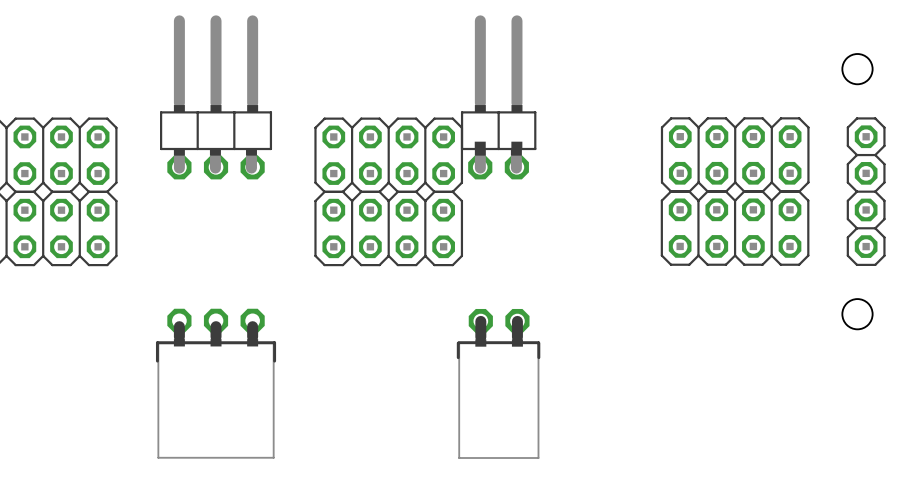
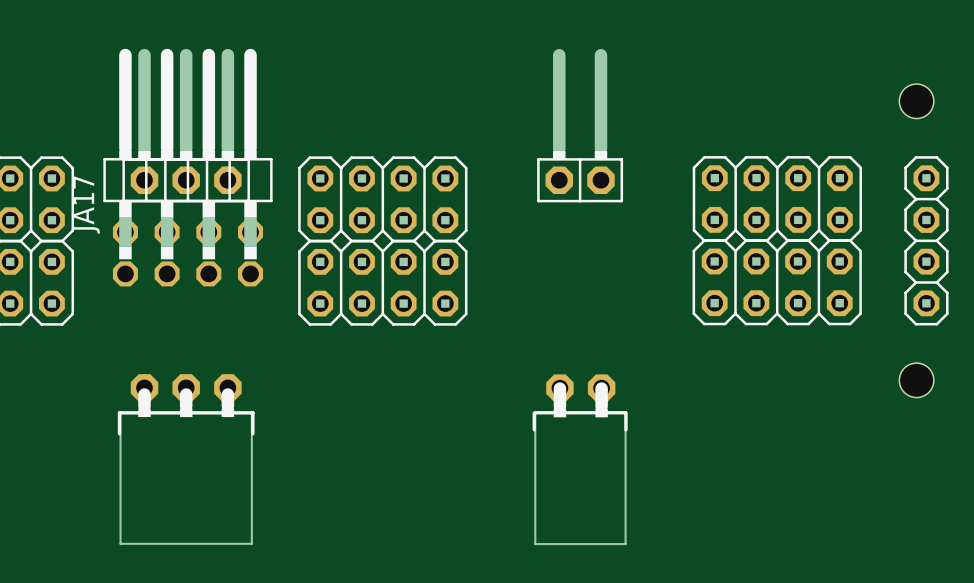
part footprint: [160, 15, 273, 180] -> [122, 48, 250, 203]
part: none -> (580, 125)
part: (498, 97) -> none
JA17: none -> (187, 167)
part position: (498, 383) -> (580, 459)

